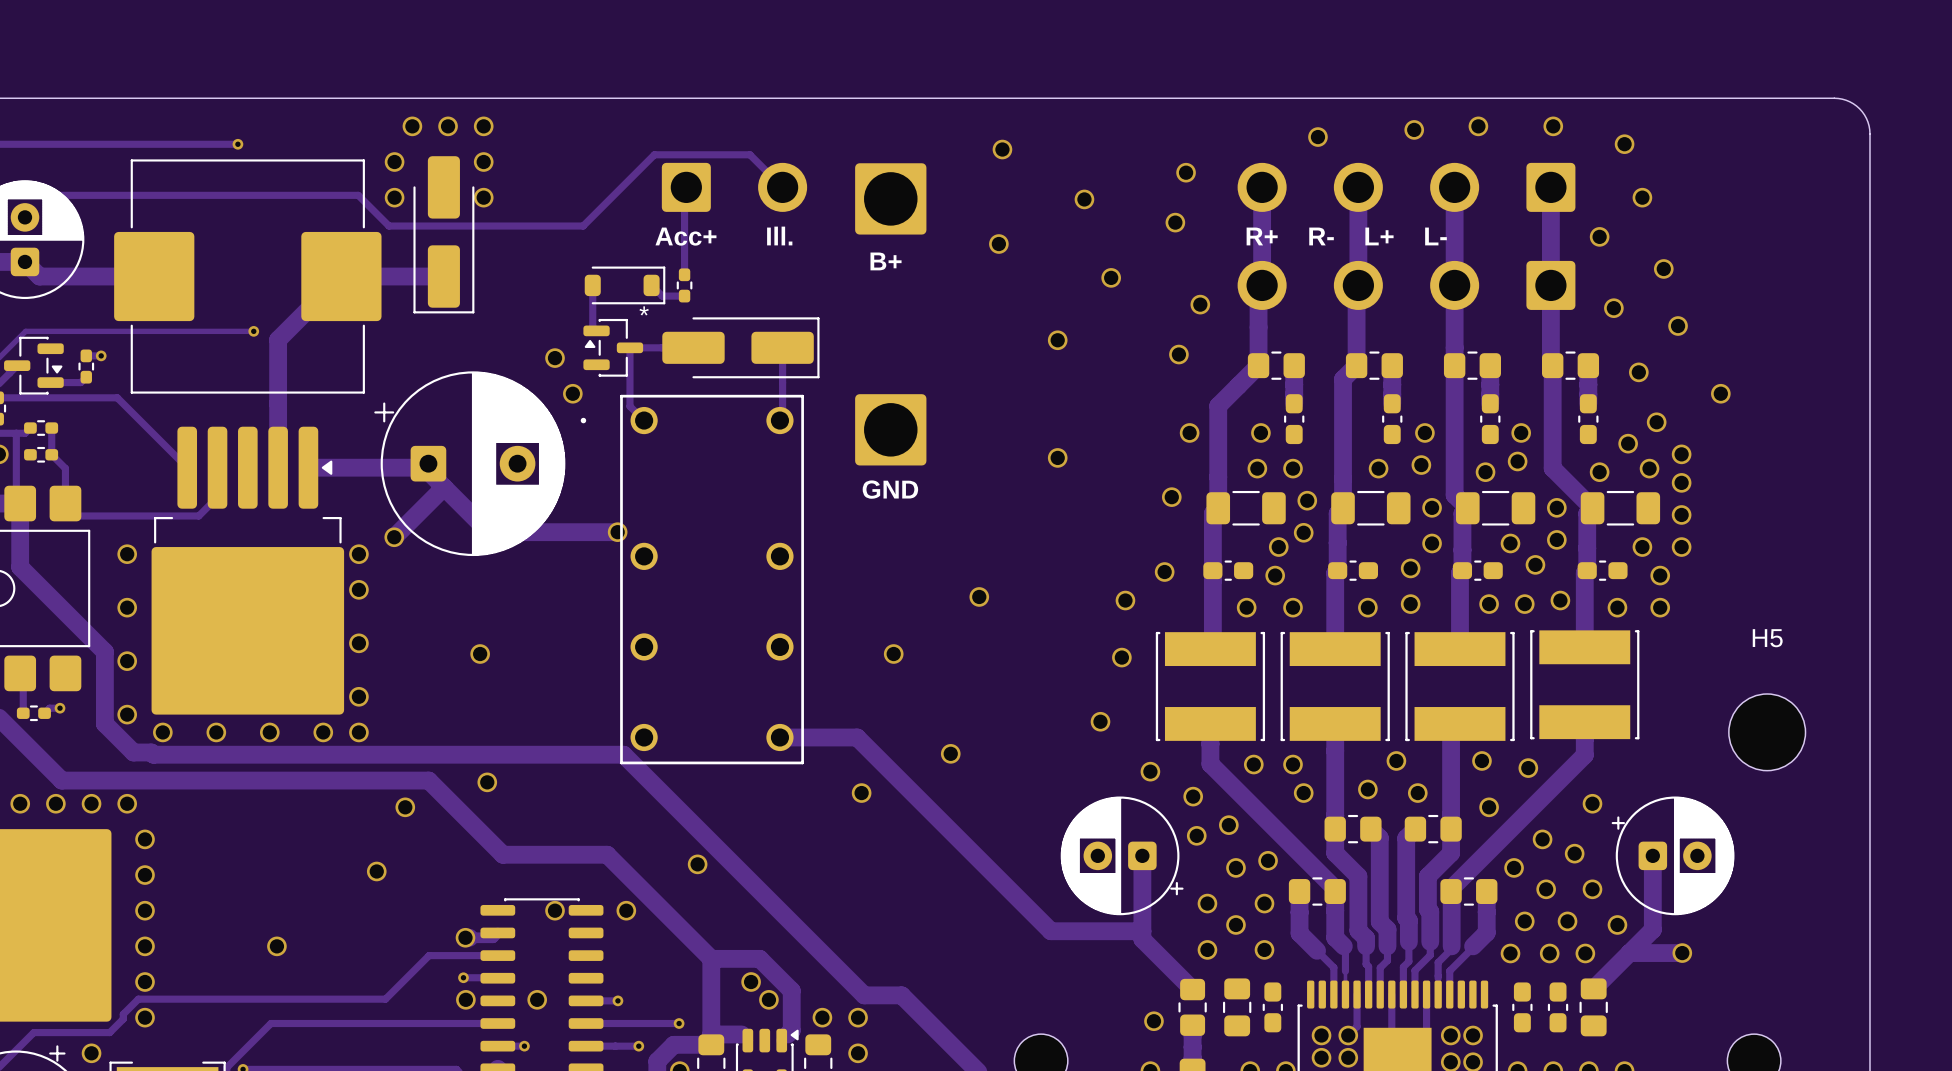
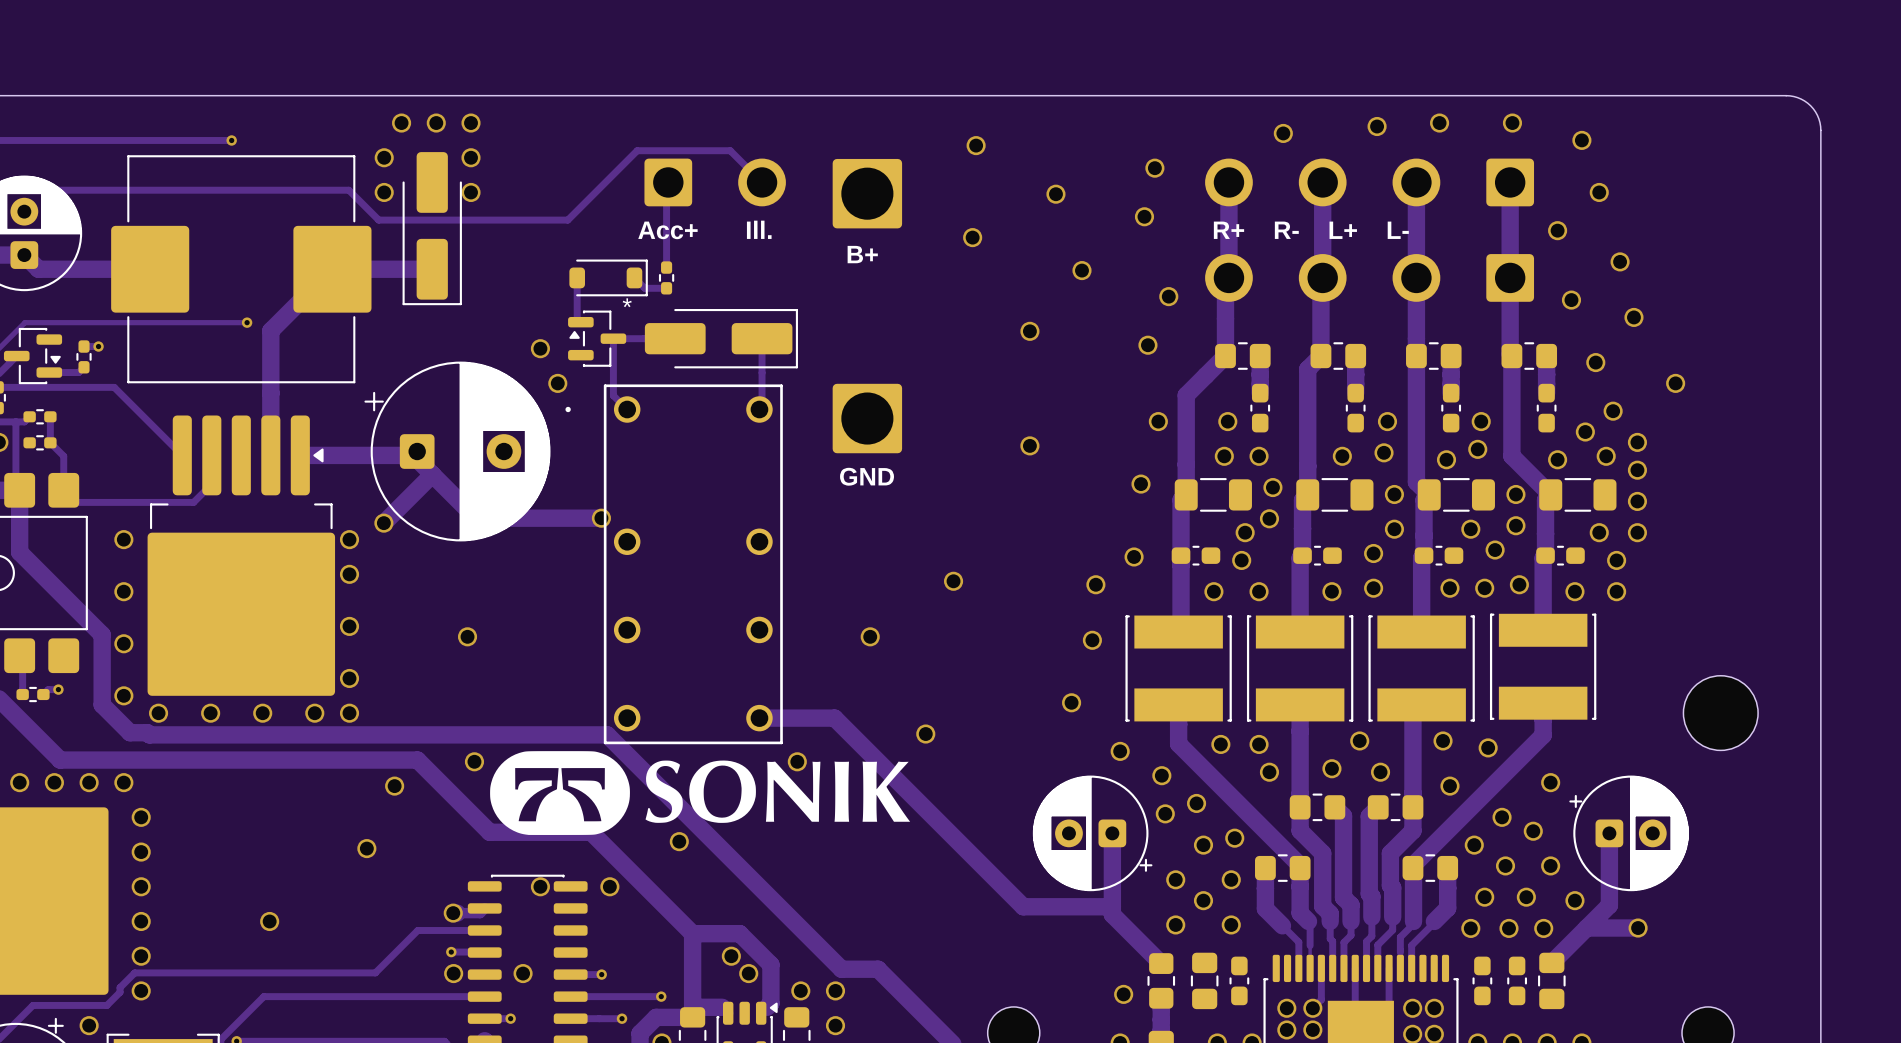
H5 name: H5 (1767, 638) -> none
drawing: none -> [490, 751, 911, 835]
via position: (861, 793) -> (797, 761)

